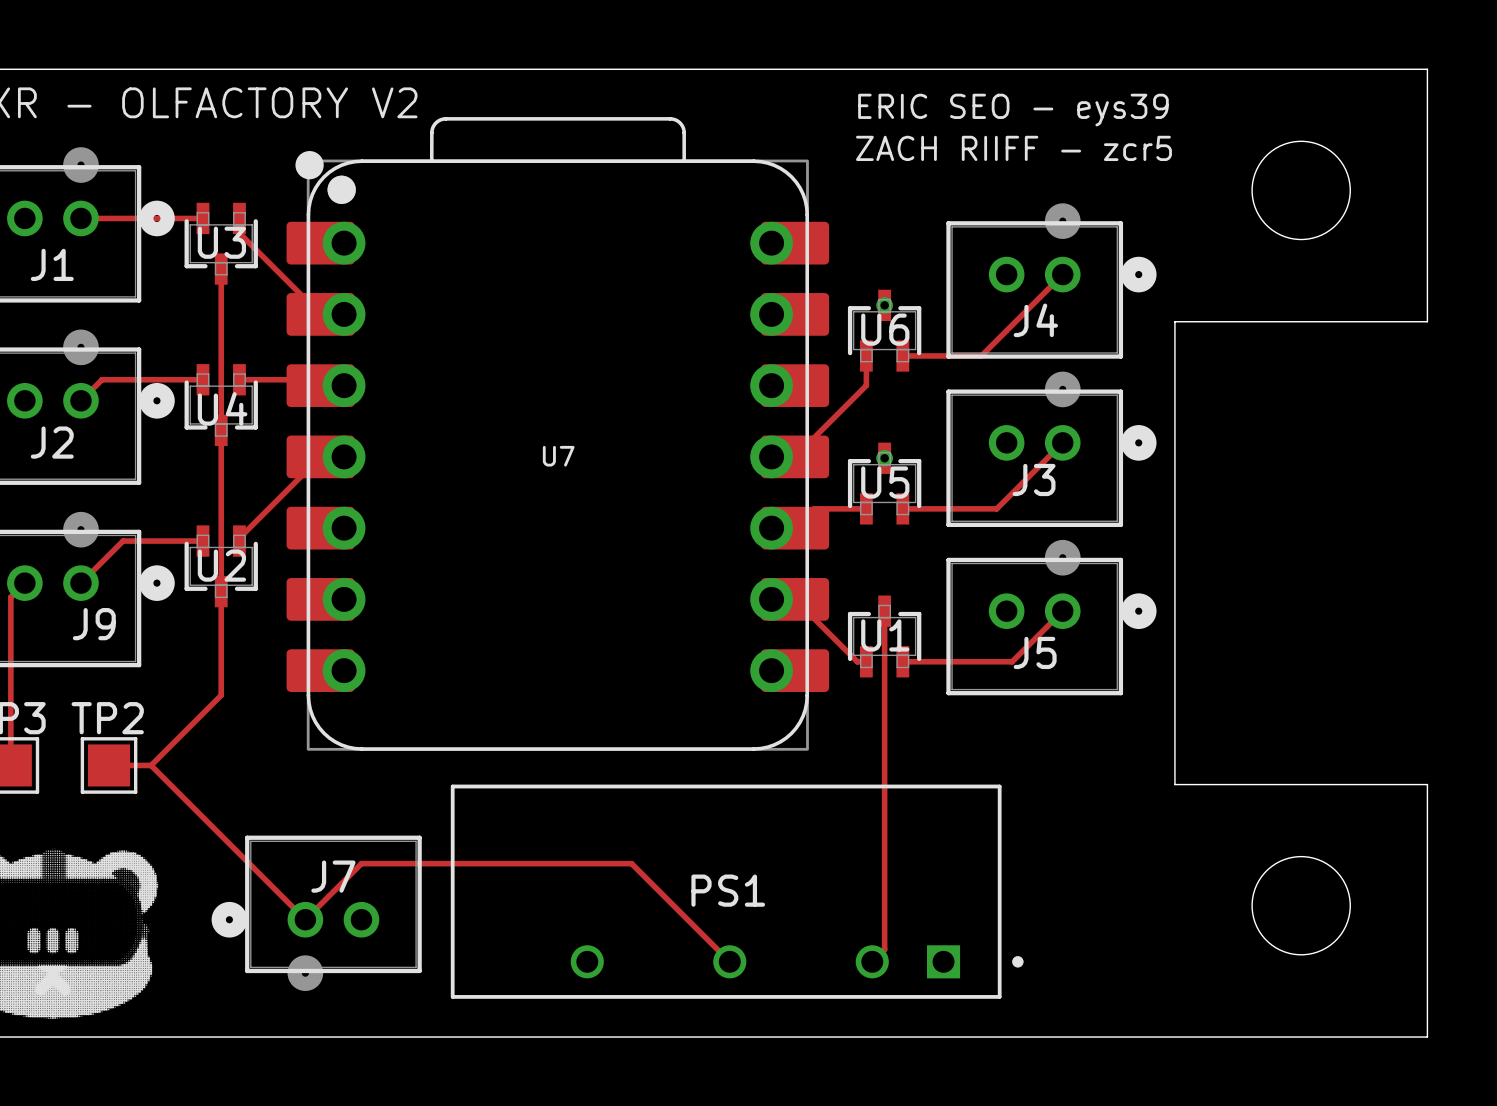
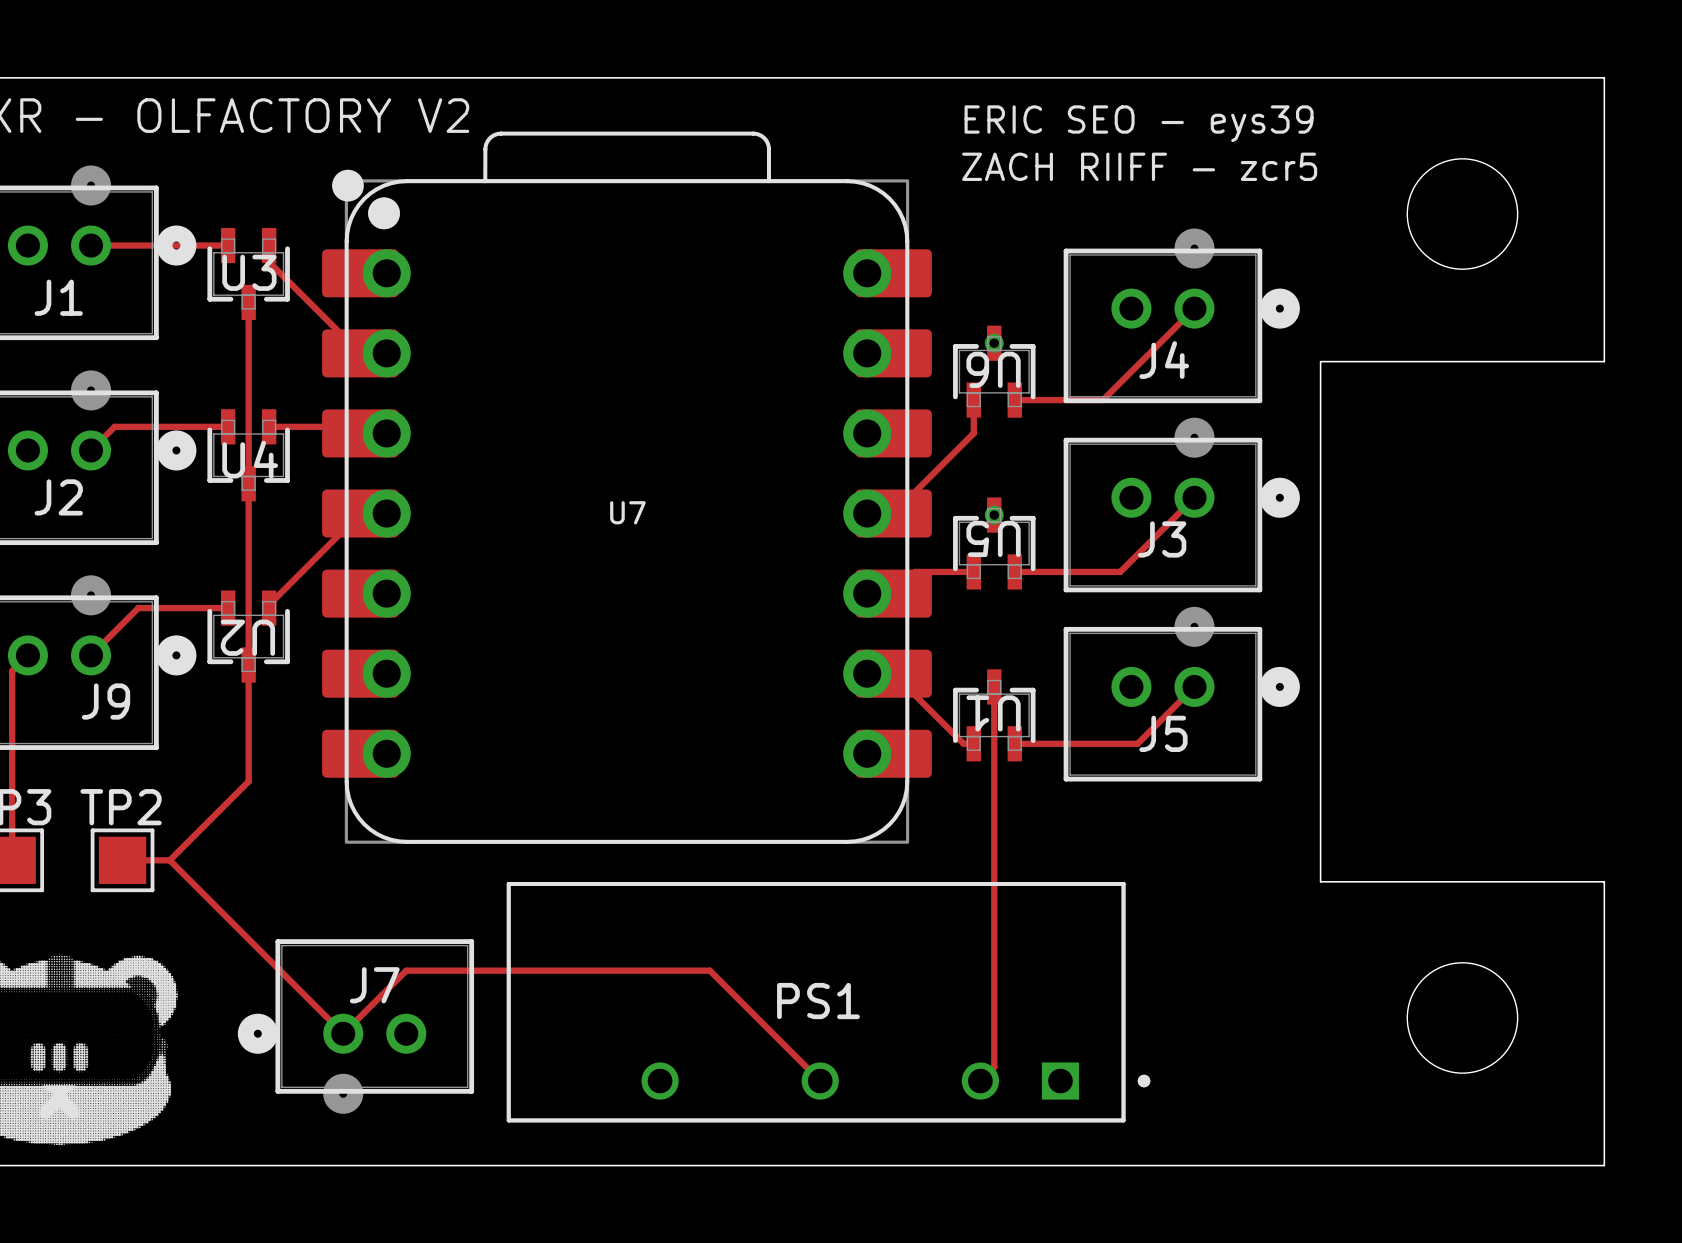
U6 name rotation: 0° (885, 329) -> 180° (993, 369)
U5 name rotation: 0° (885, 482) -> 180° (993, 538)
U2 name rotation: 0° (221, 565) -> 180° (247, 637)
U1 name rotation: 0° (885, 635) -> 180° (993, 713)

